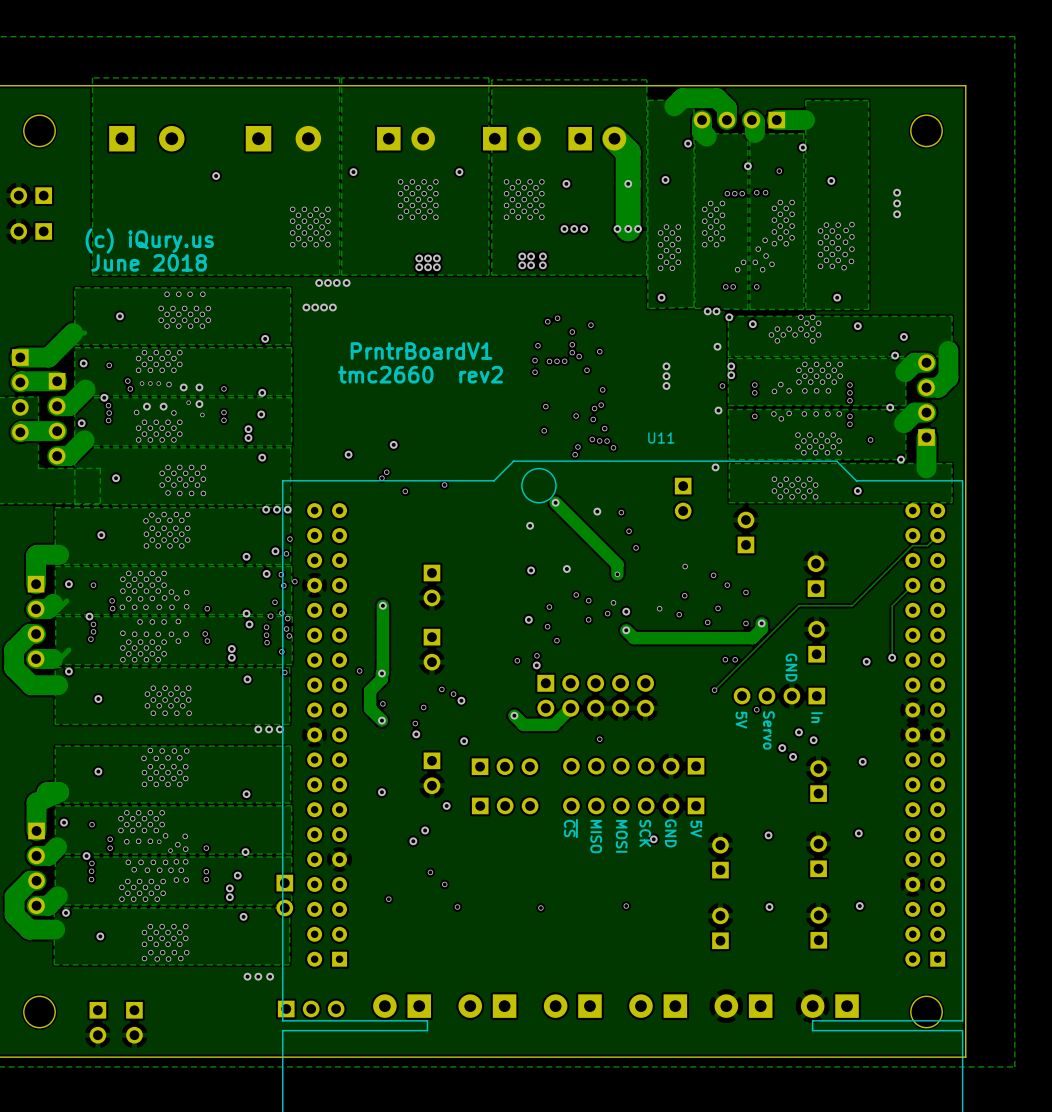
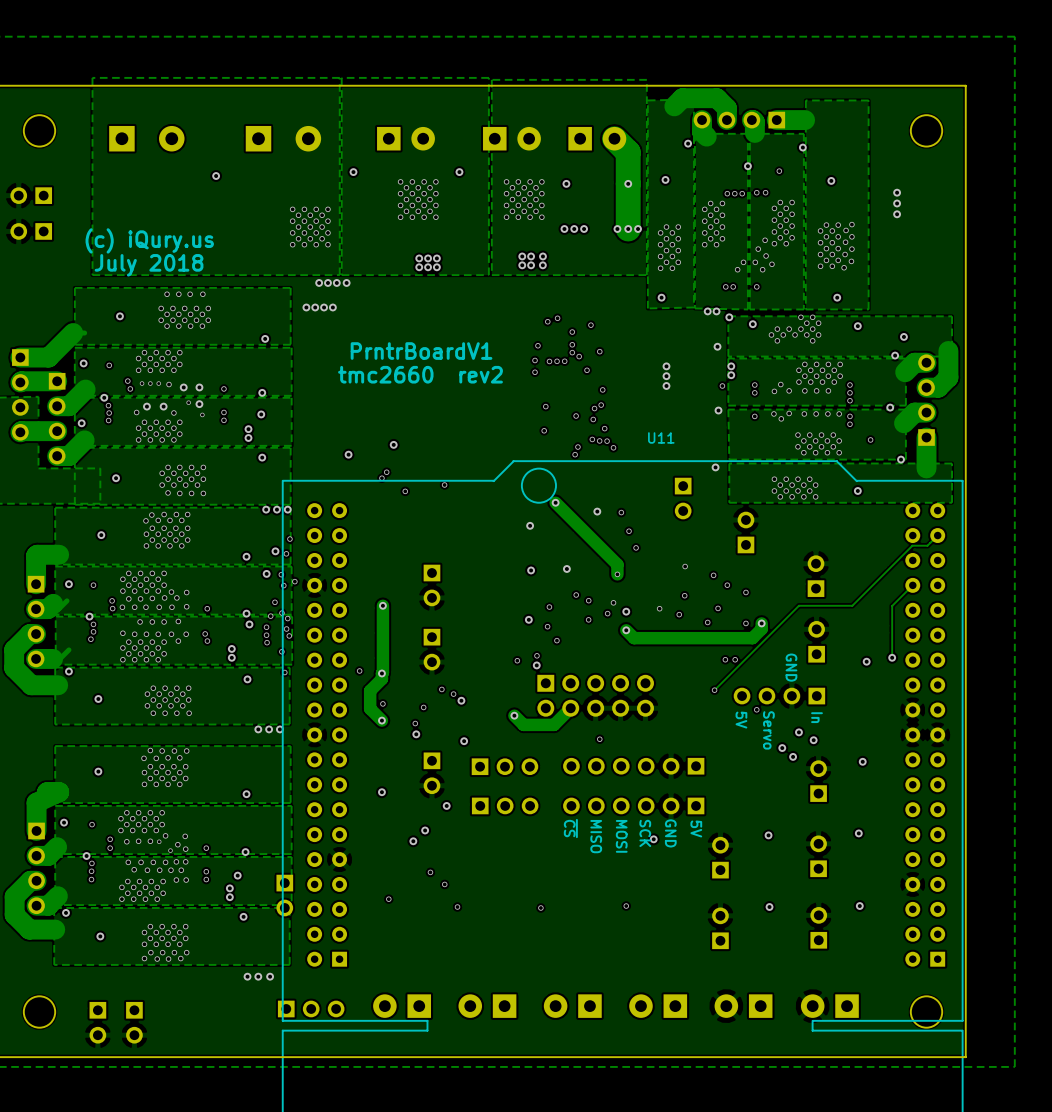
text: June 2018 (149, 262) -> July 2018 (149, 265)

